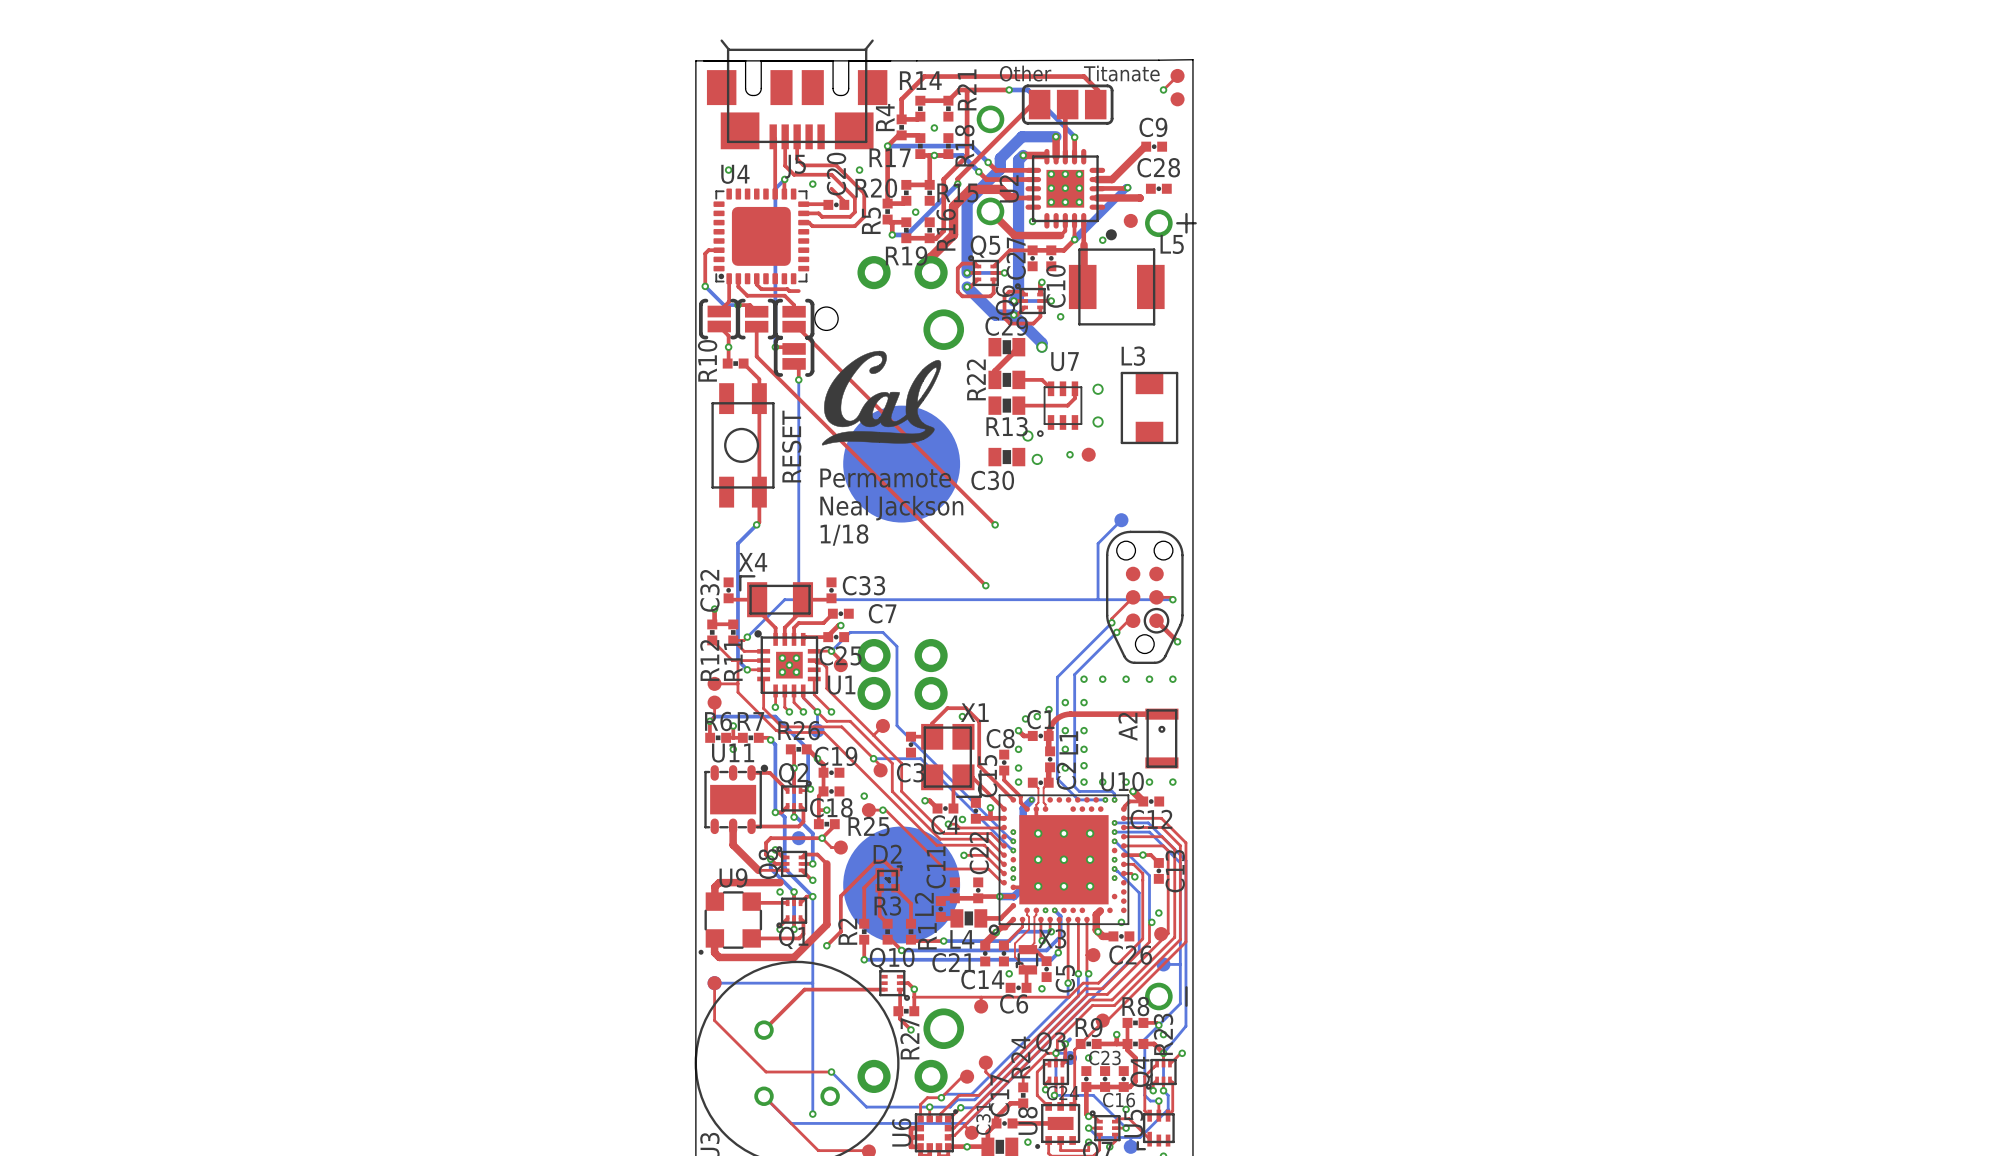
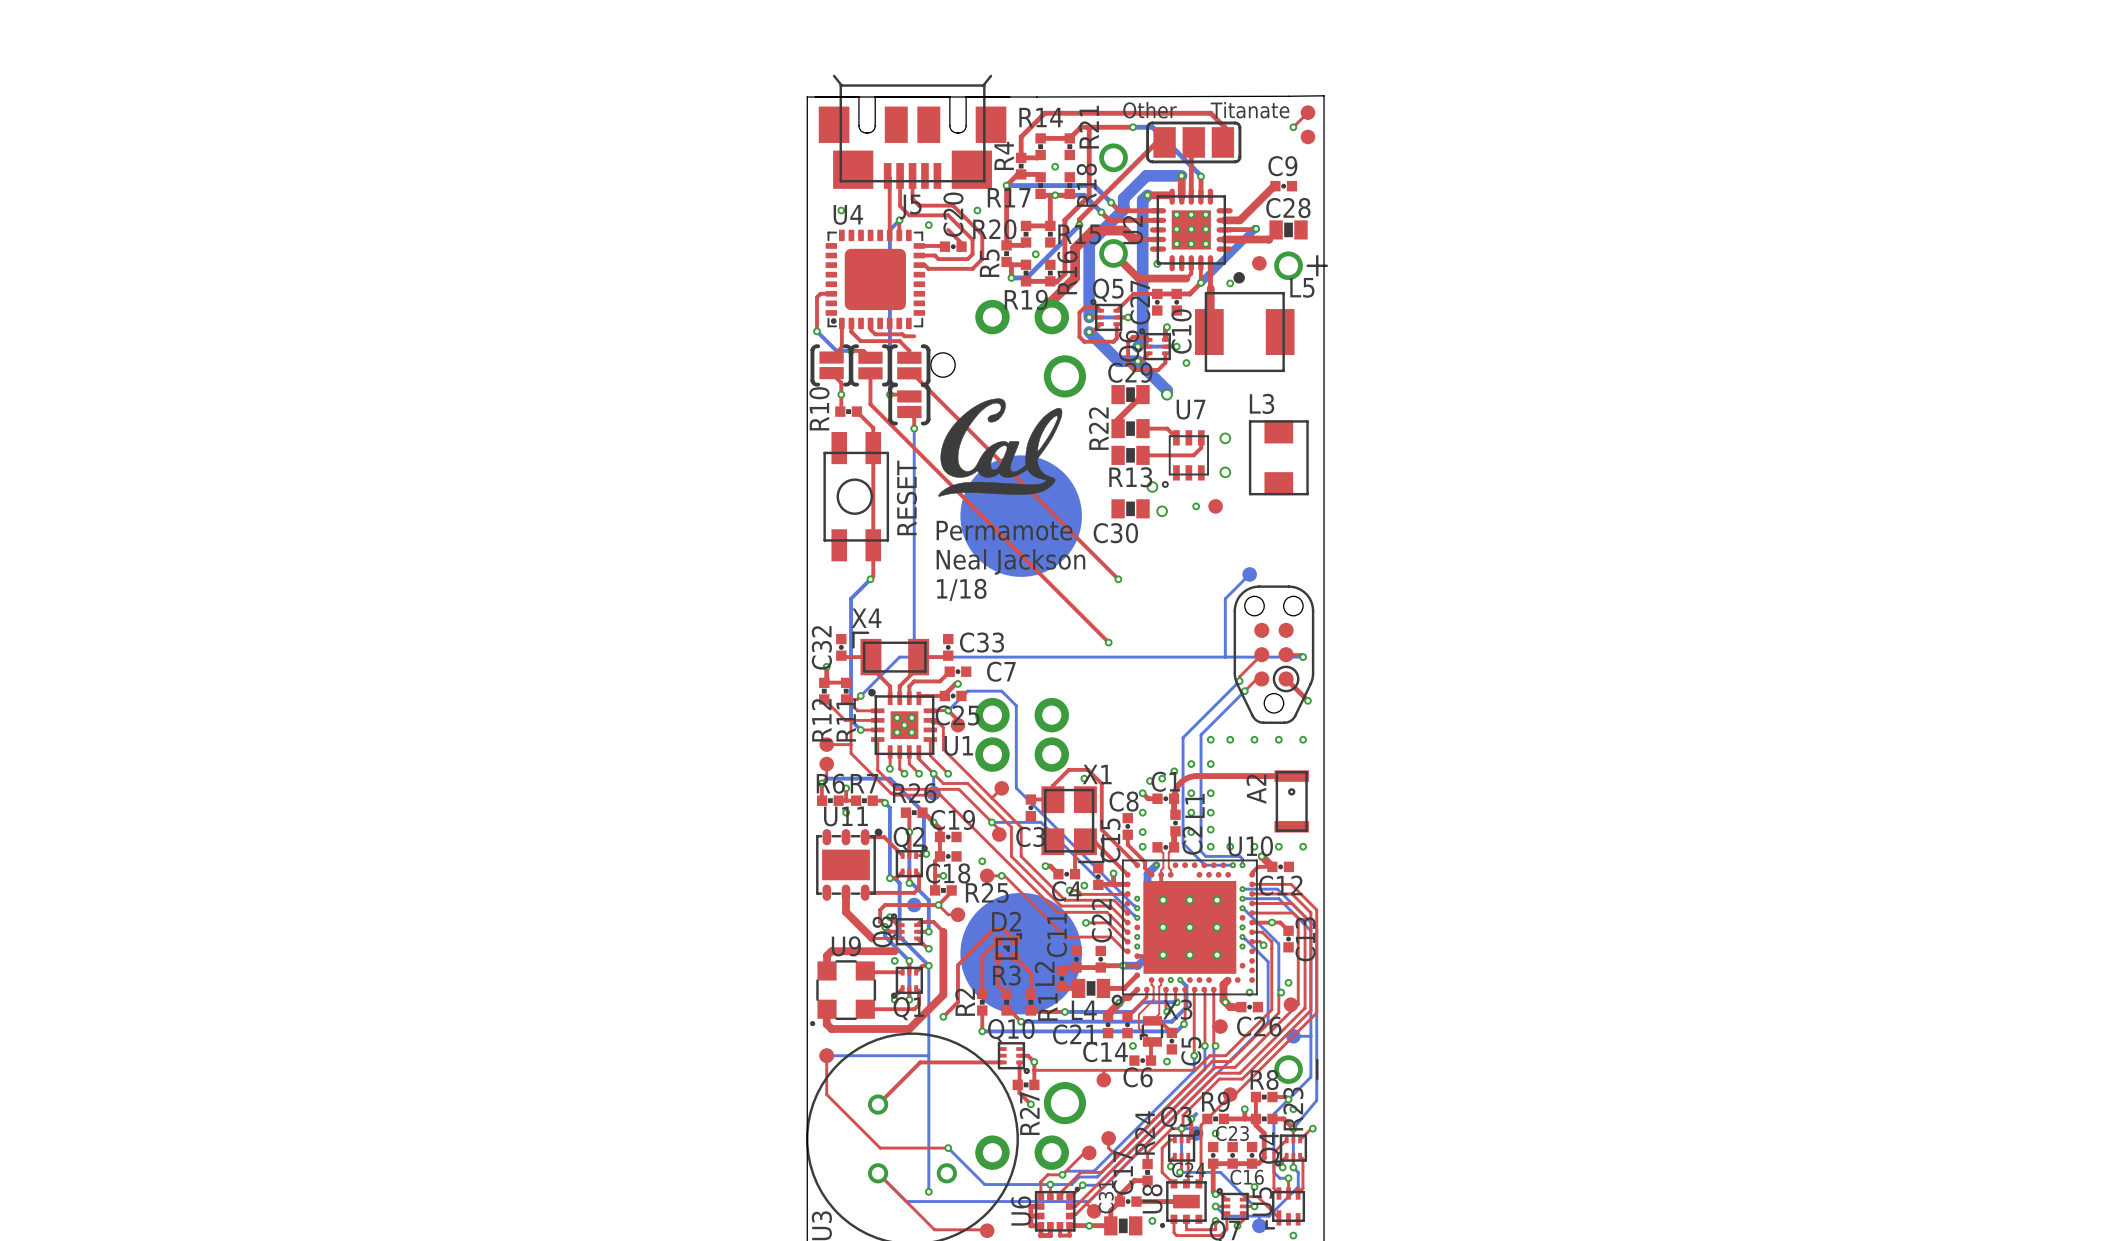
C28 footprint: [1145, 183, 1172, 194] -> [1269, 220, 1308, 240]

